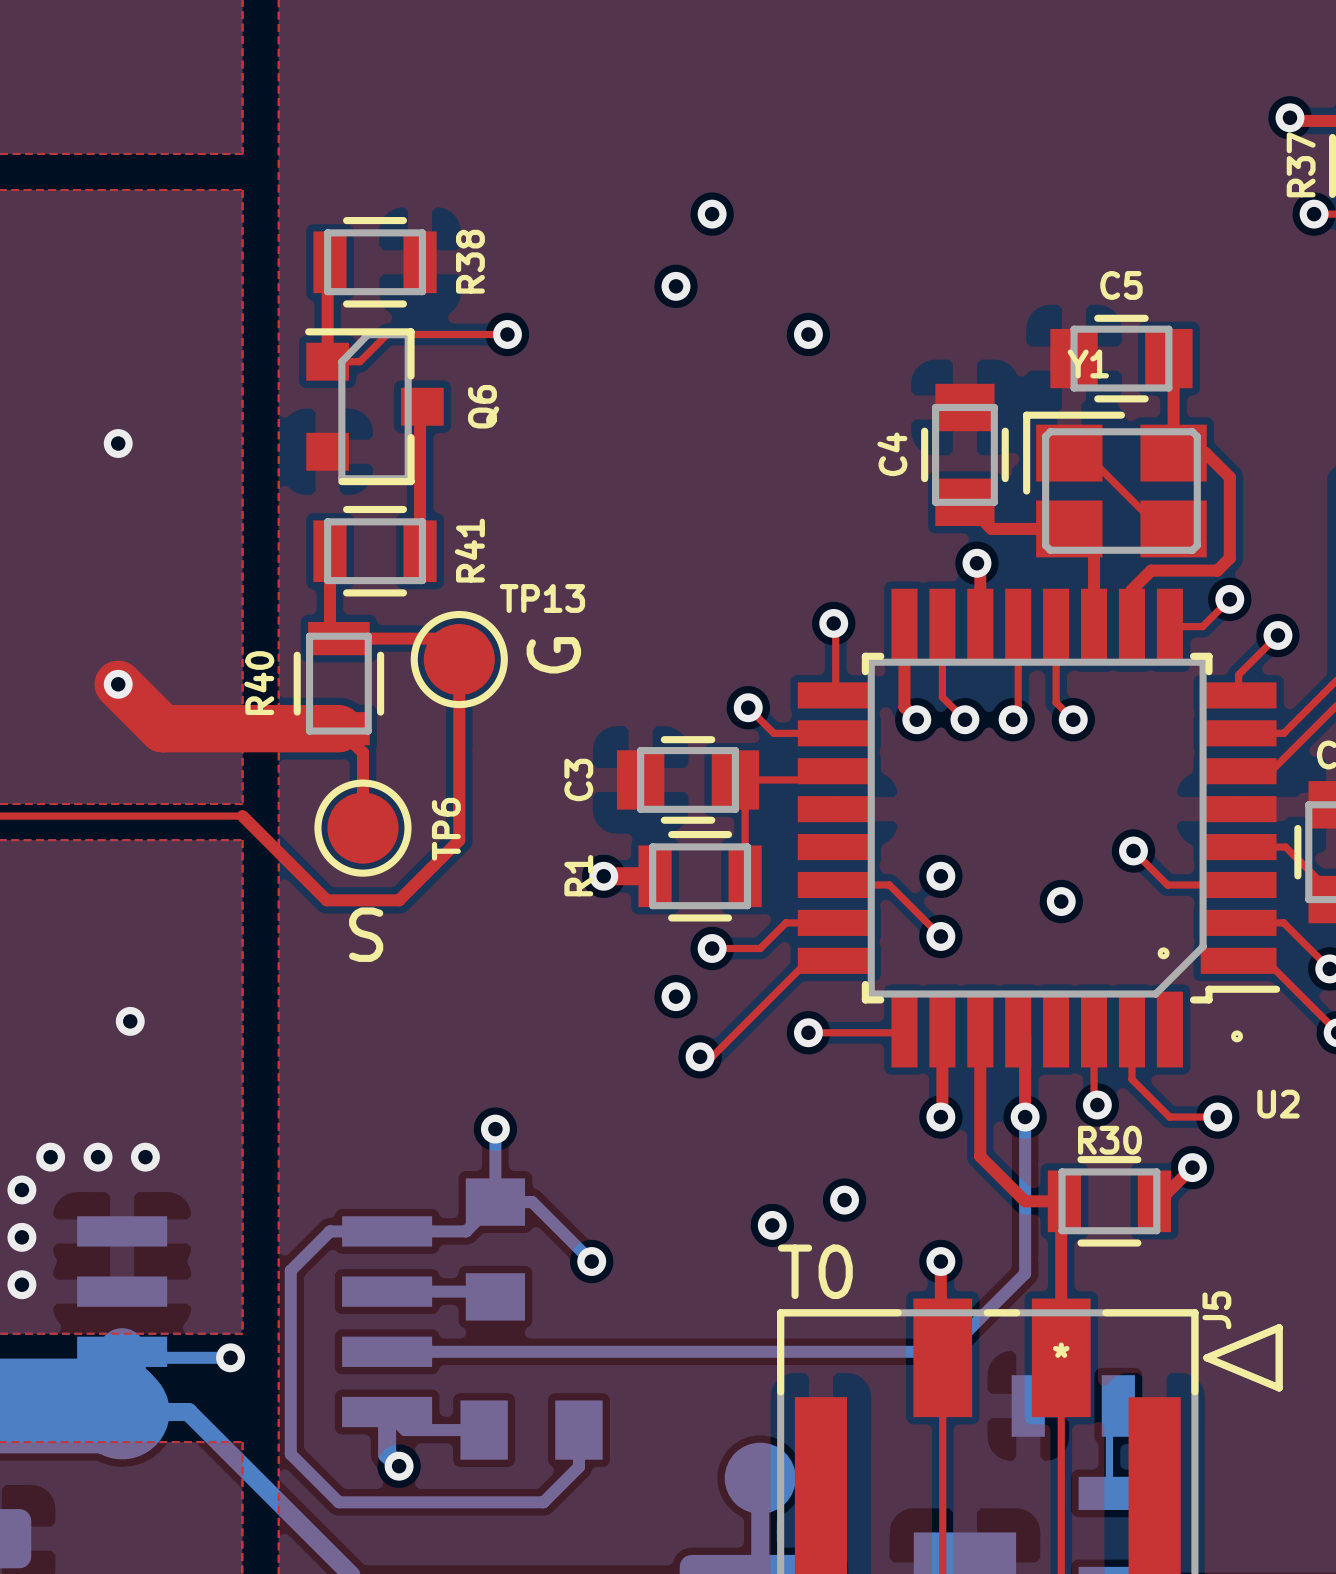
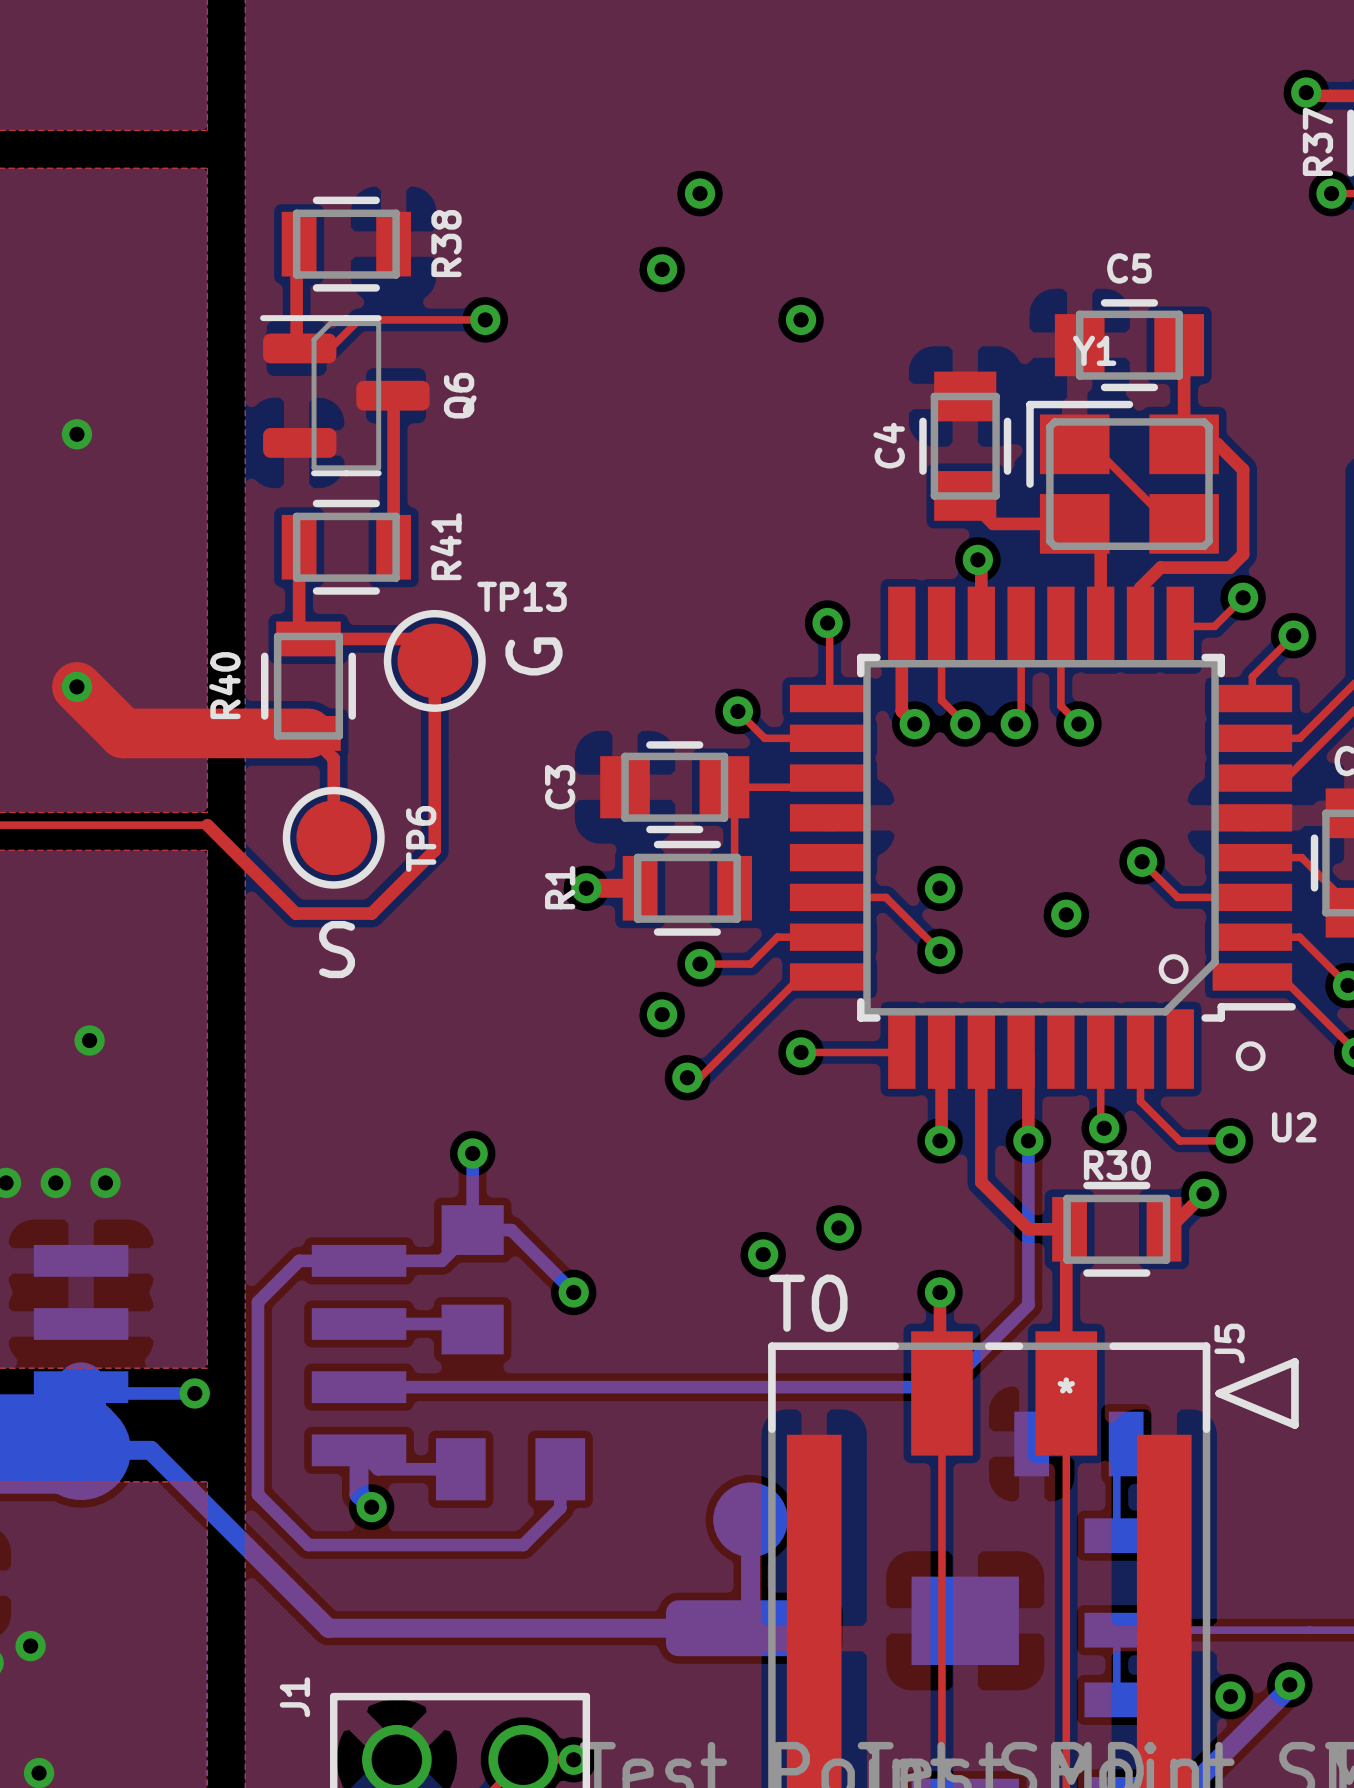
Q6 footprint: [305, 328, 444, 486] -> [260, 315, 430, 477]
U2 footprint: [797, 588, 1281, 1068] -> [789, 586, 1296, 1089]

